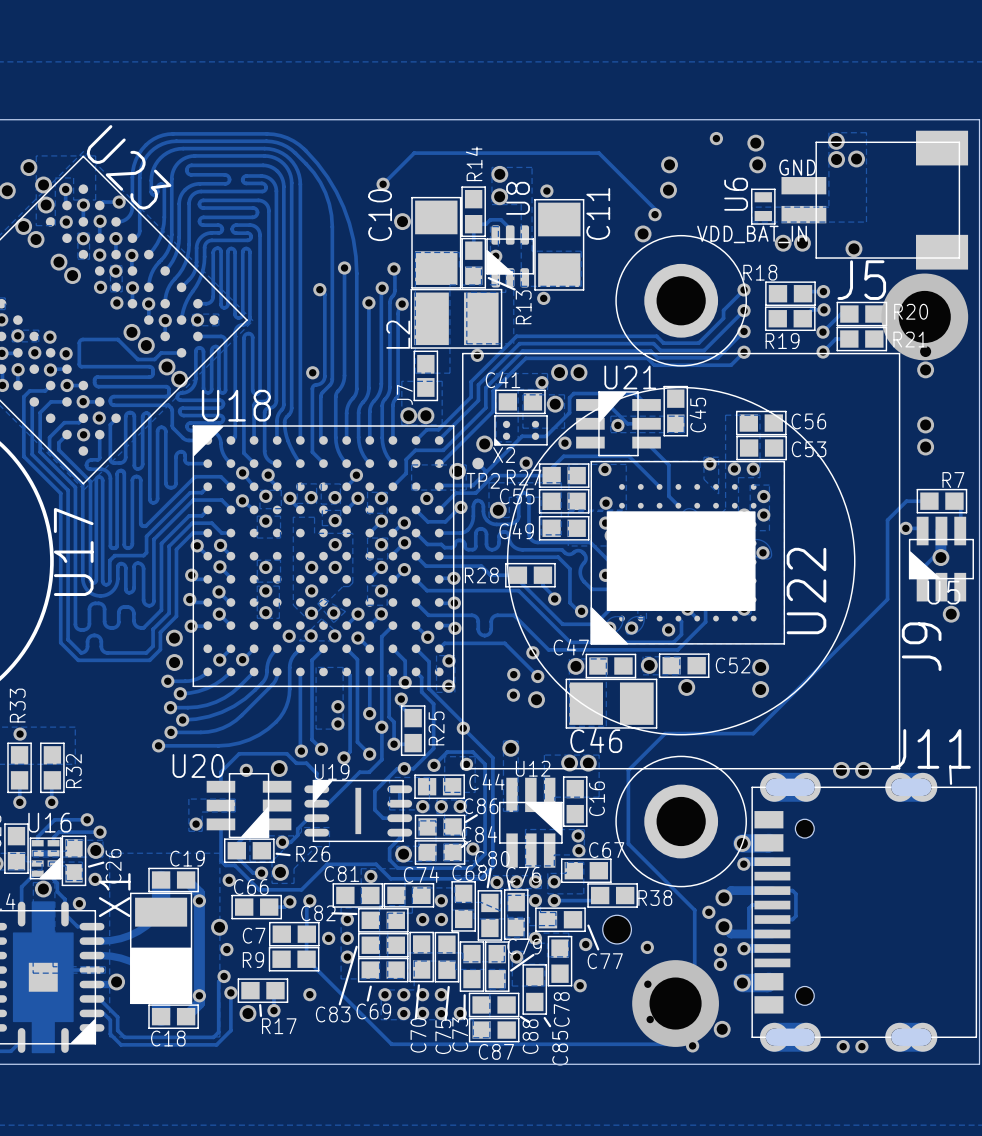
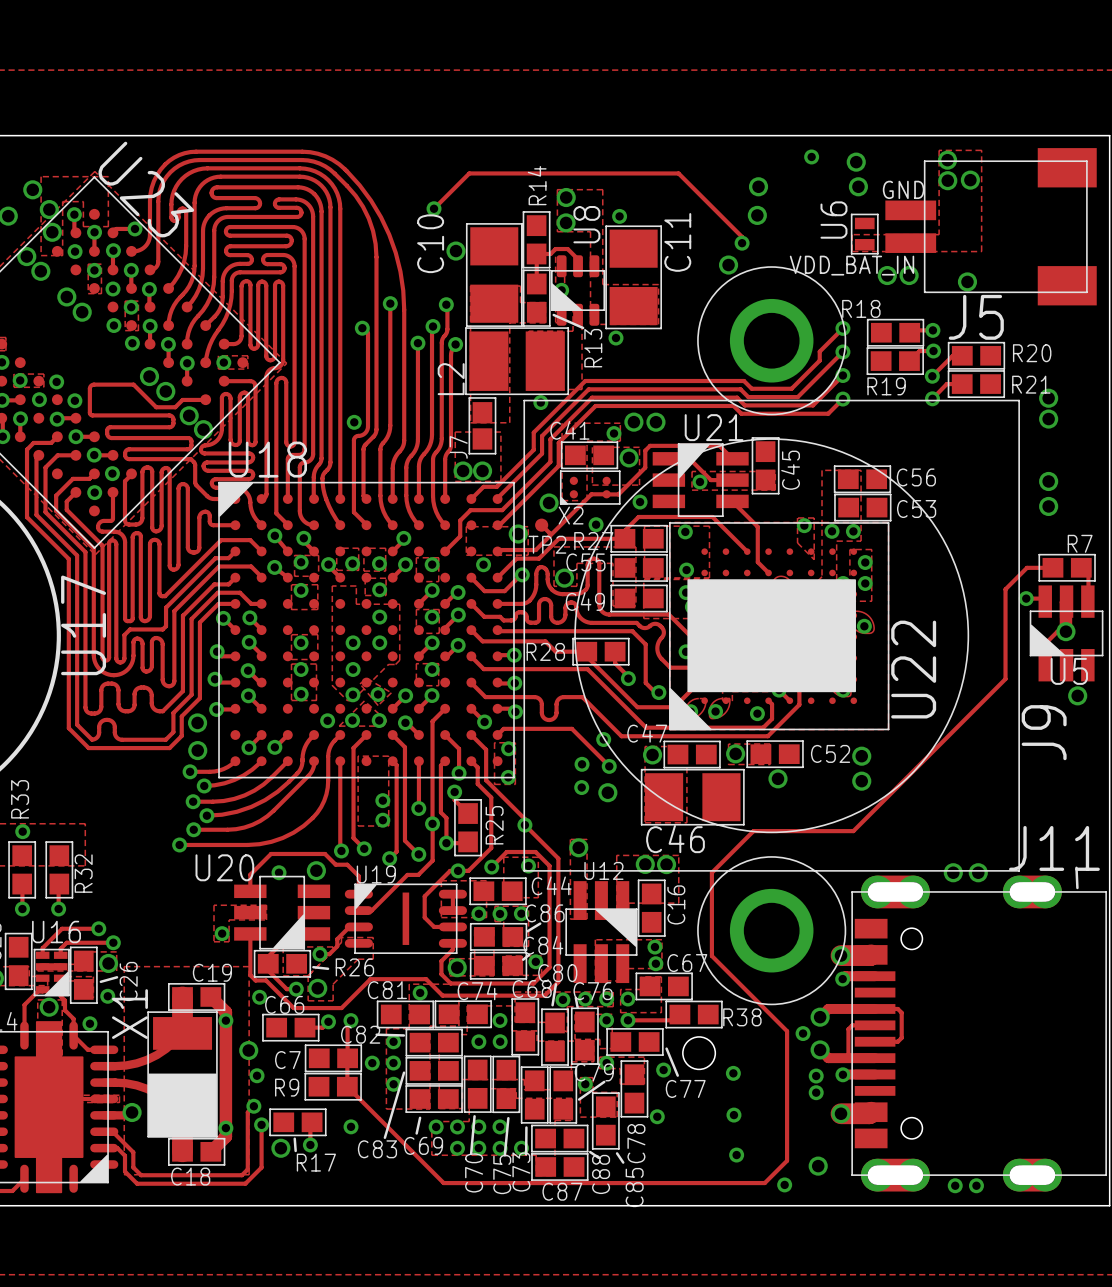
via: (924, 316) -> none
via: (675, 1003) -> none

